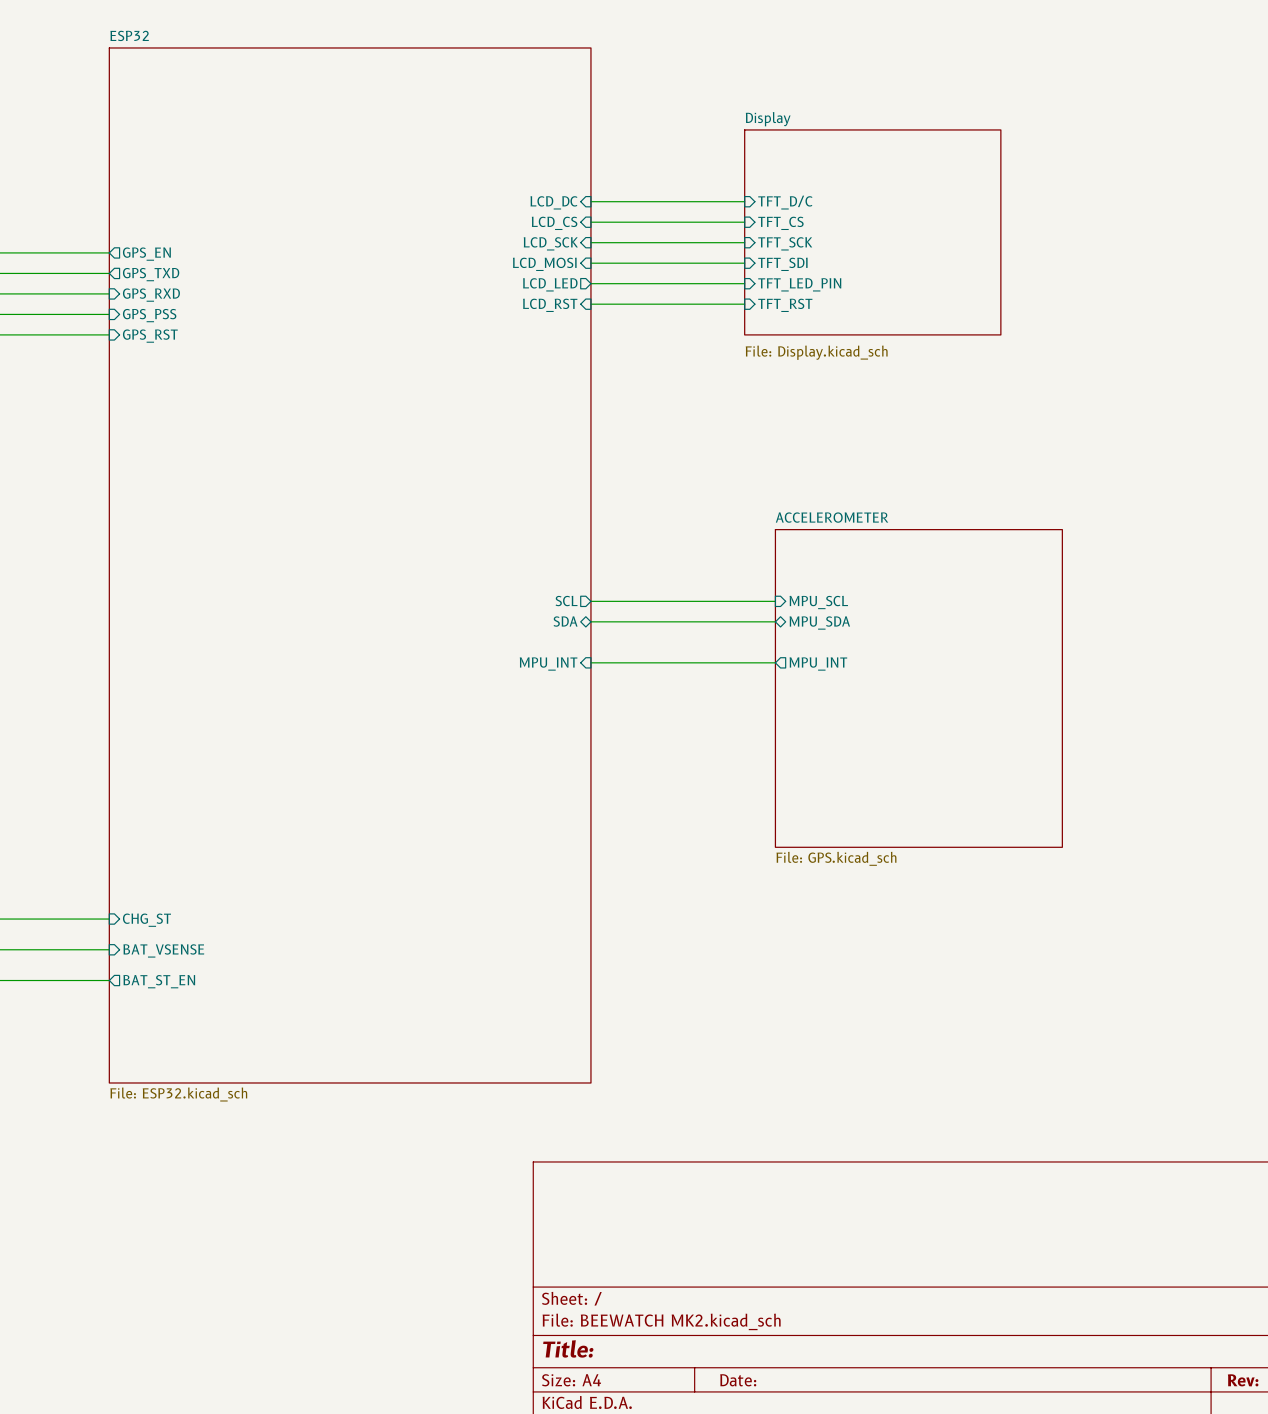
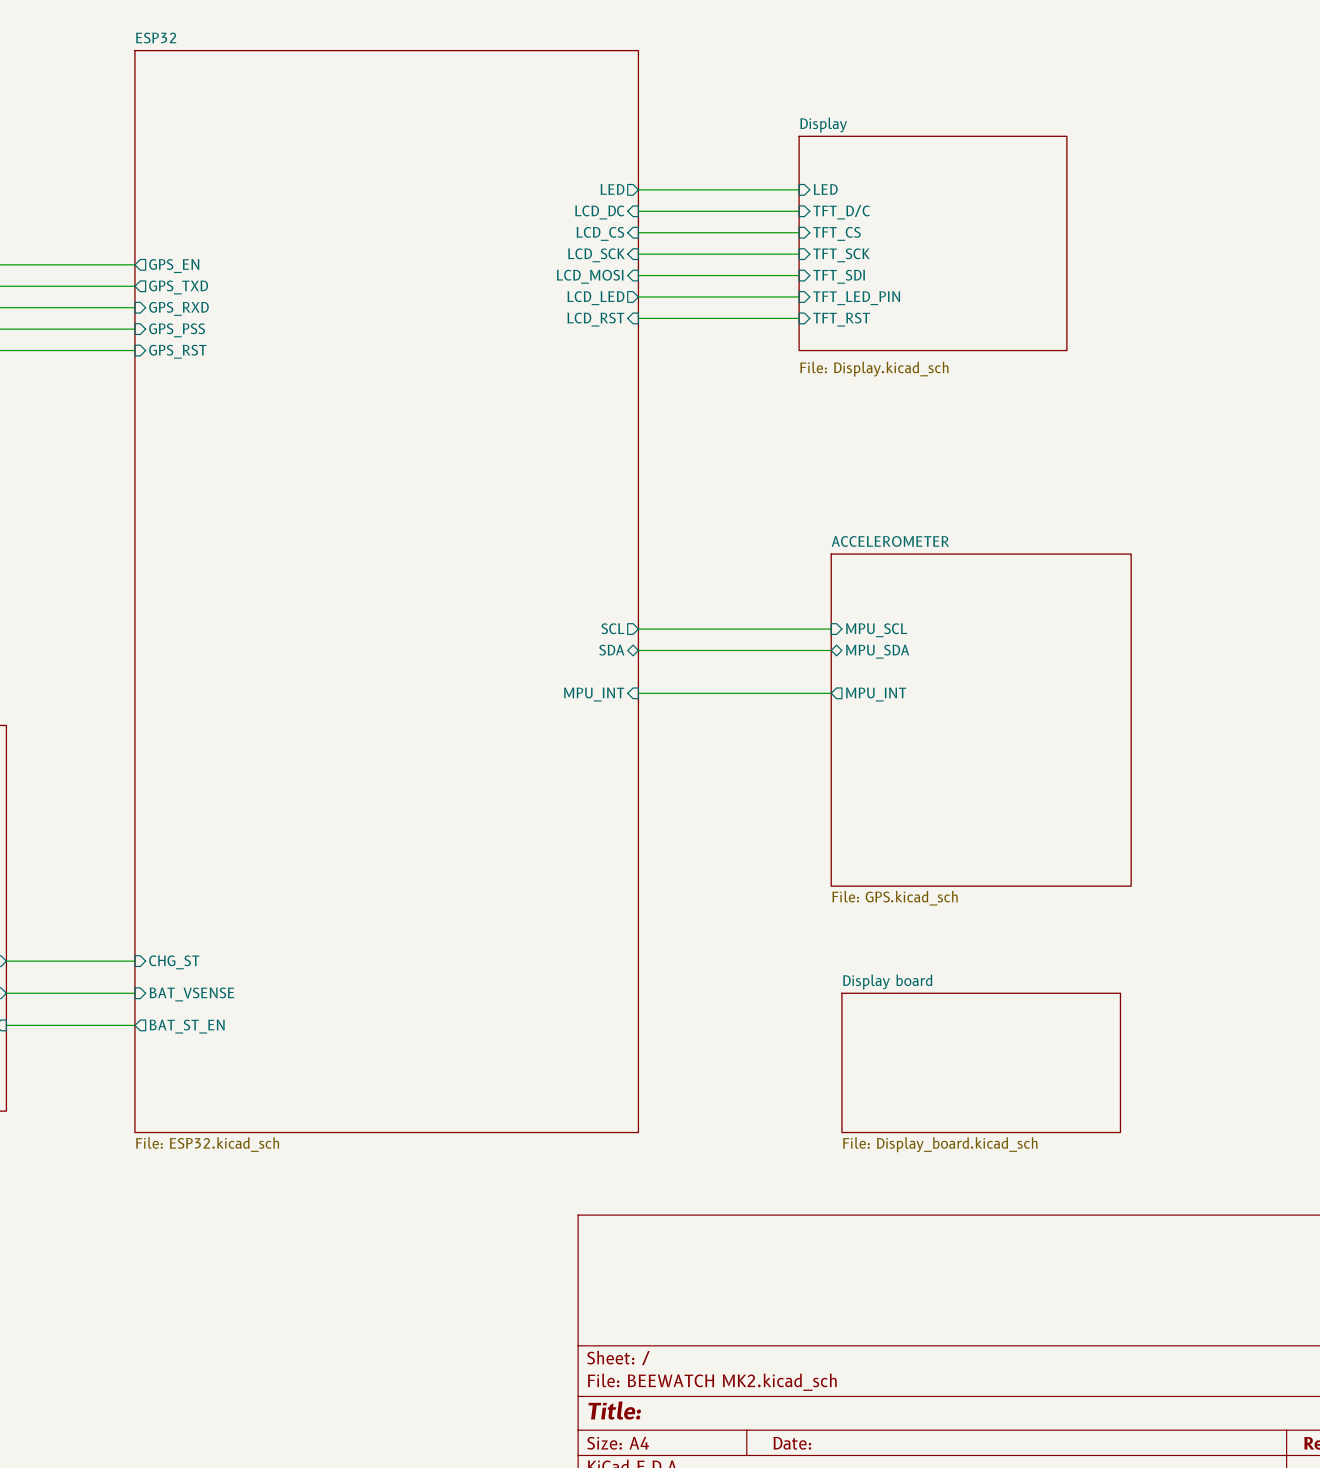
sheet pin: none -> LED (612, 189)
sheet pin: none -> LED (825, 189)
wire: none -> (638, 189) (799, 189)
sheet Display board: none -> File: Display_board.kicad_sch (981, 1062)

